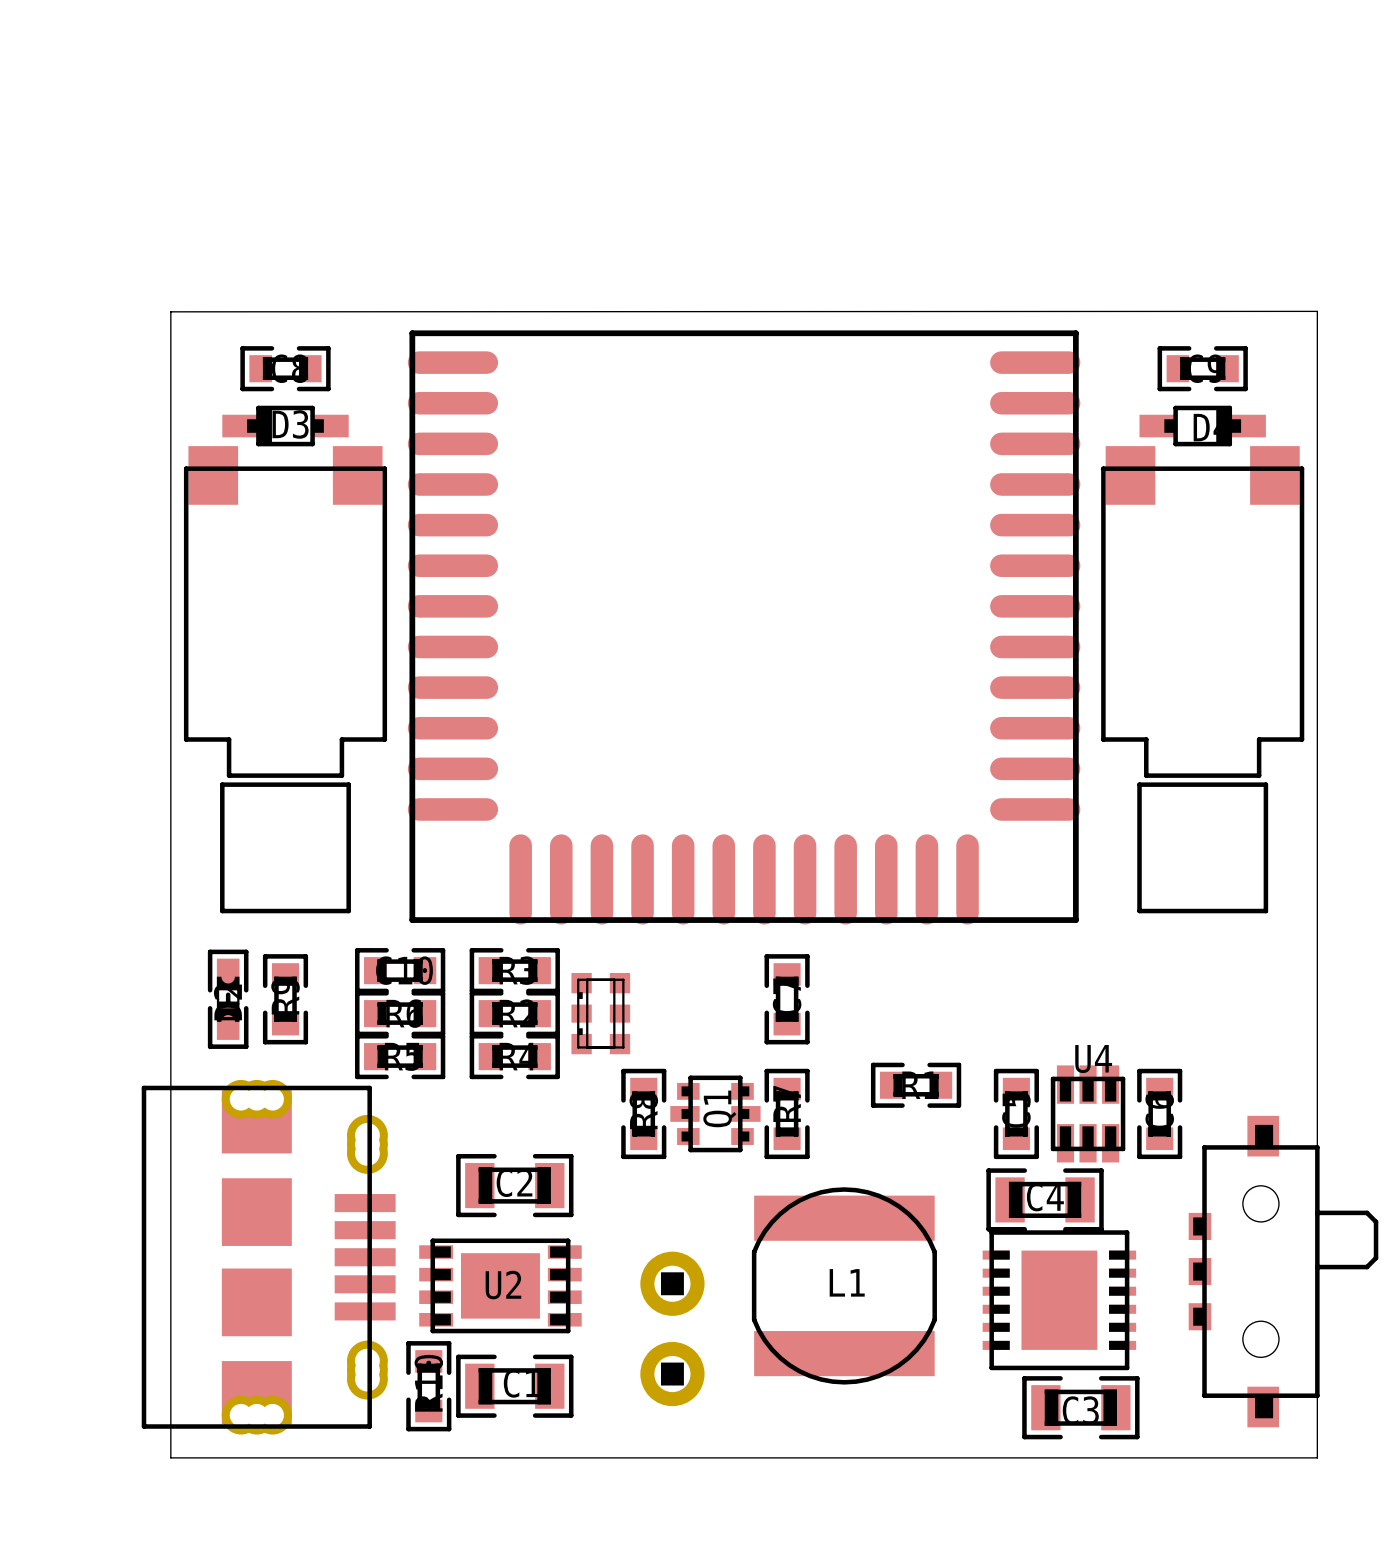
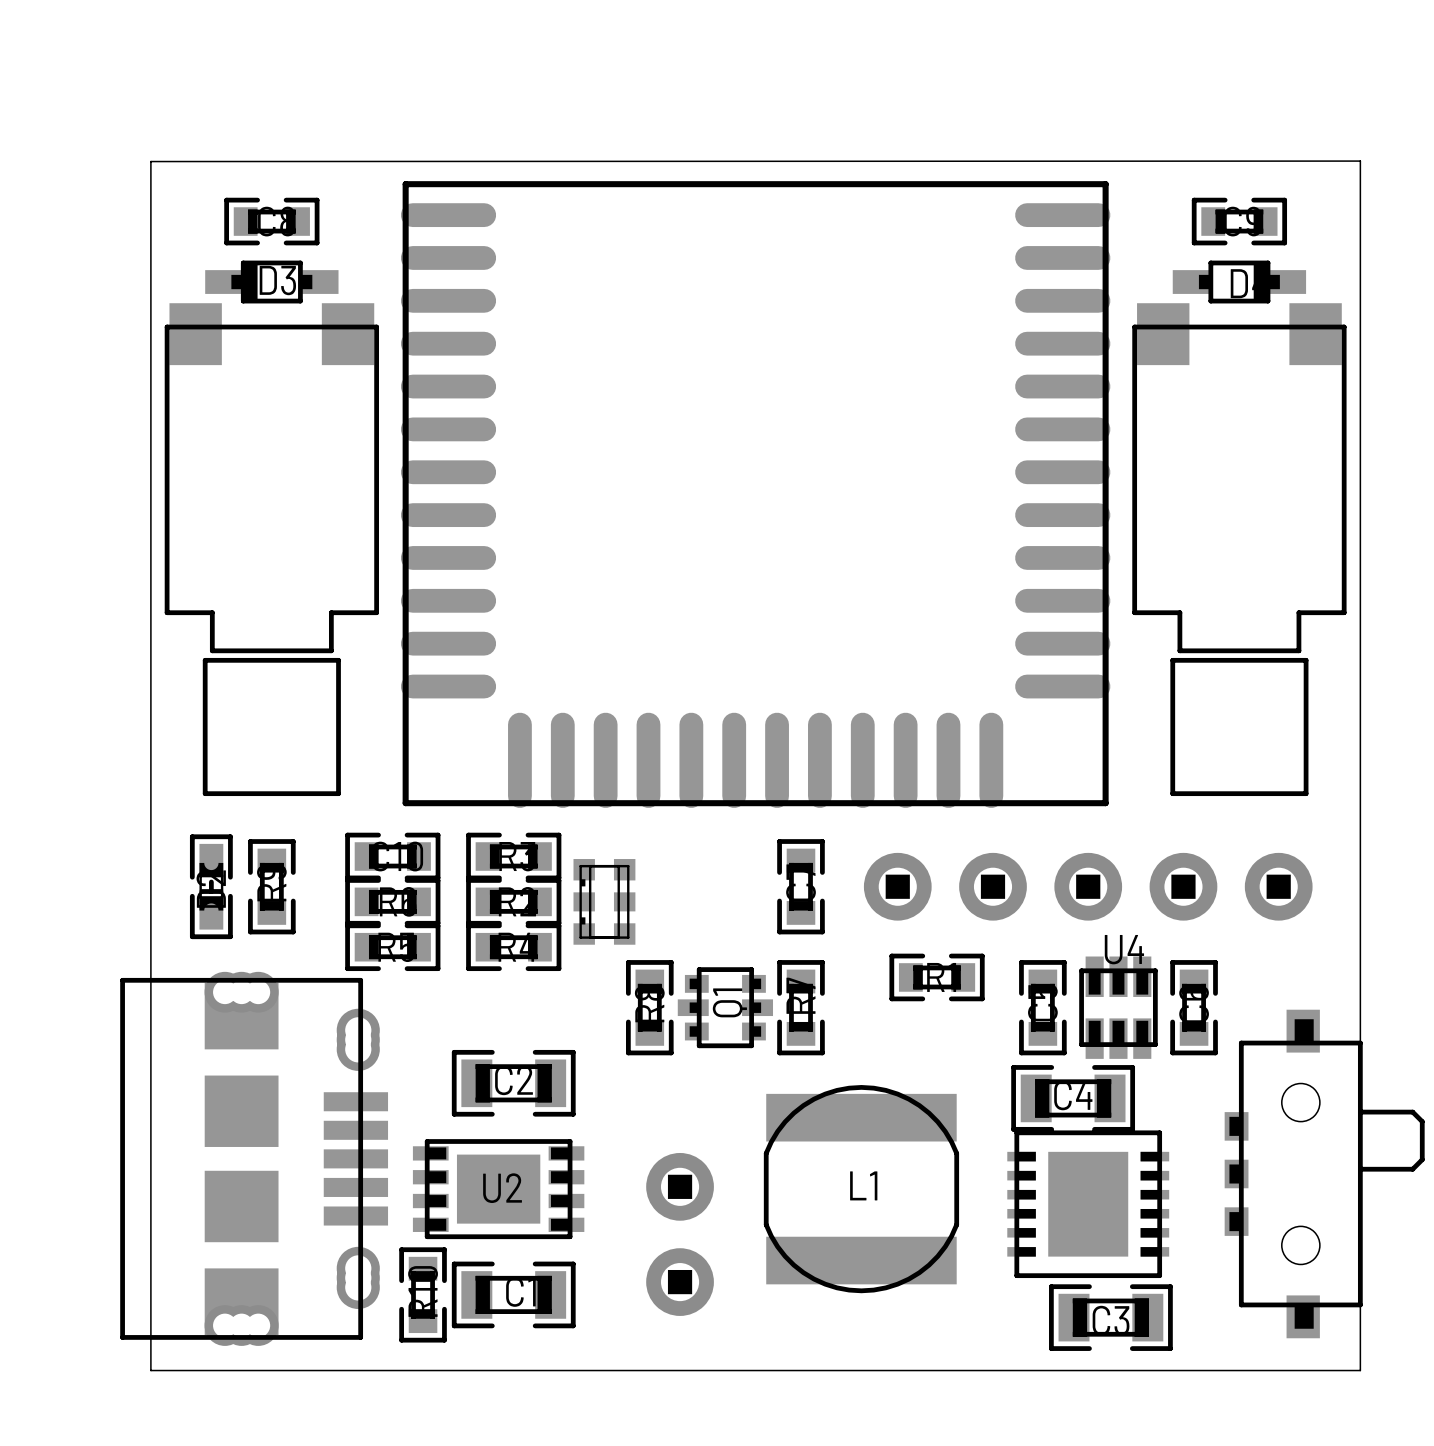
part: none -> (1088, 886)

